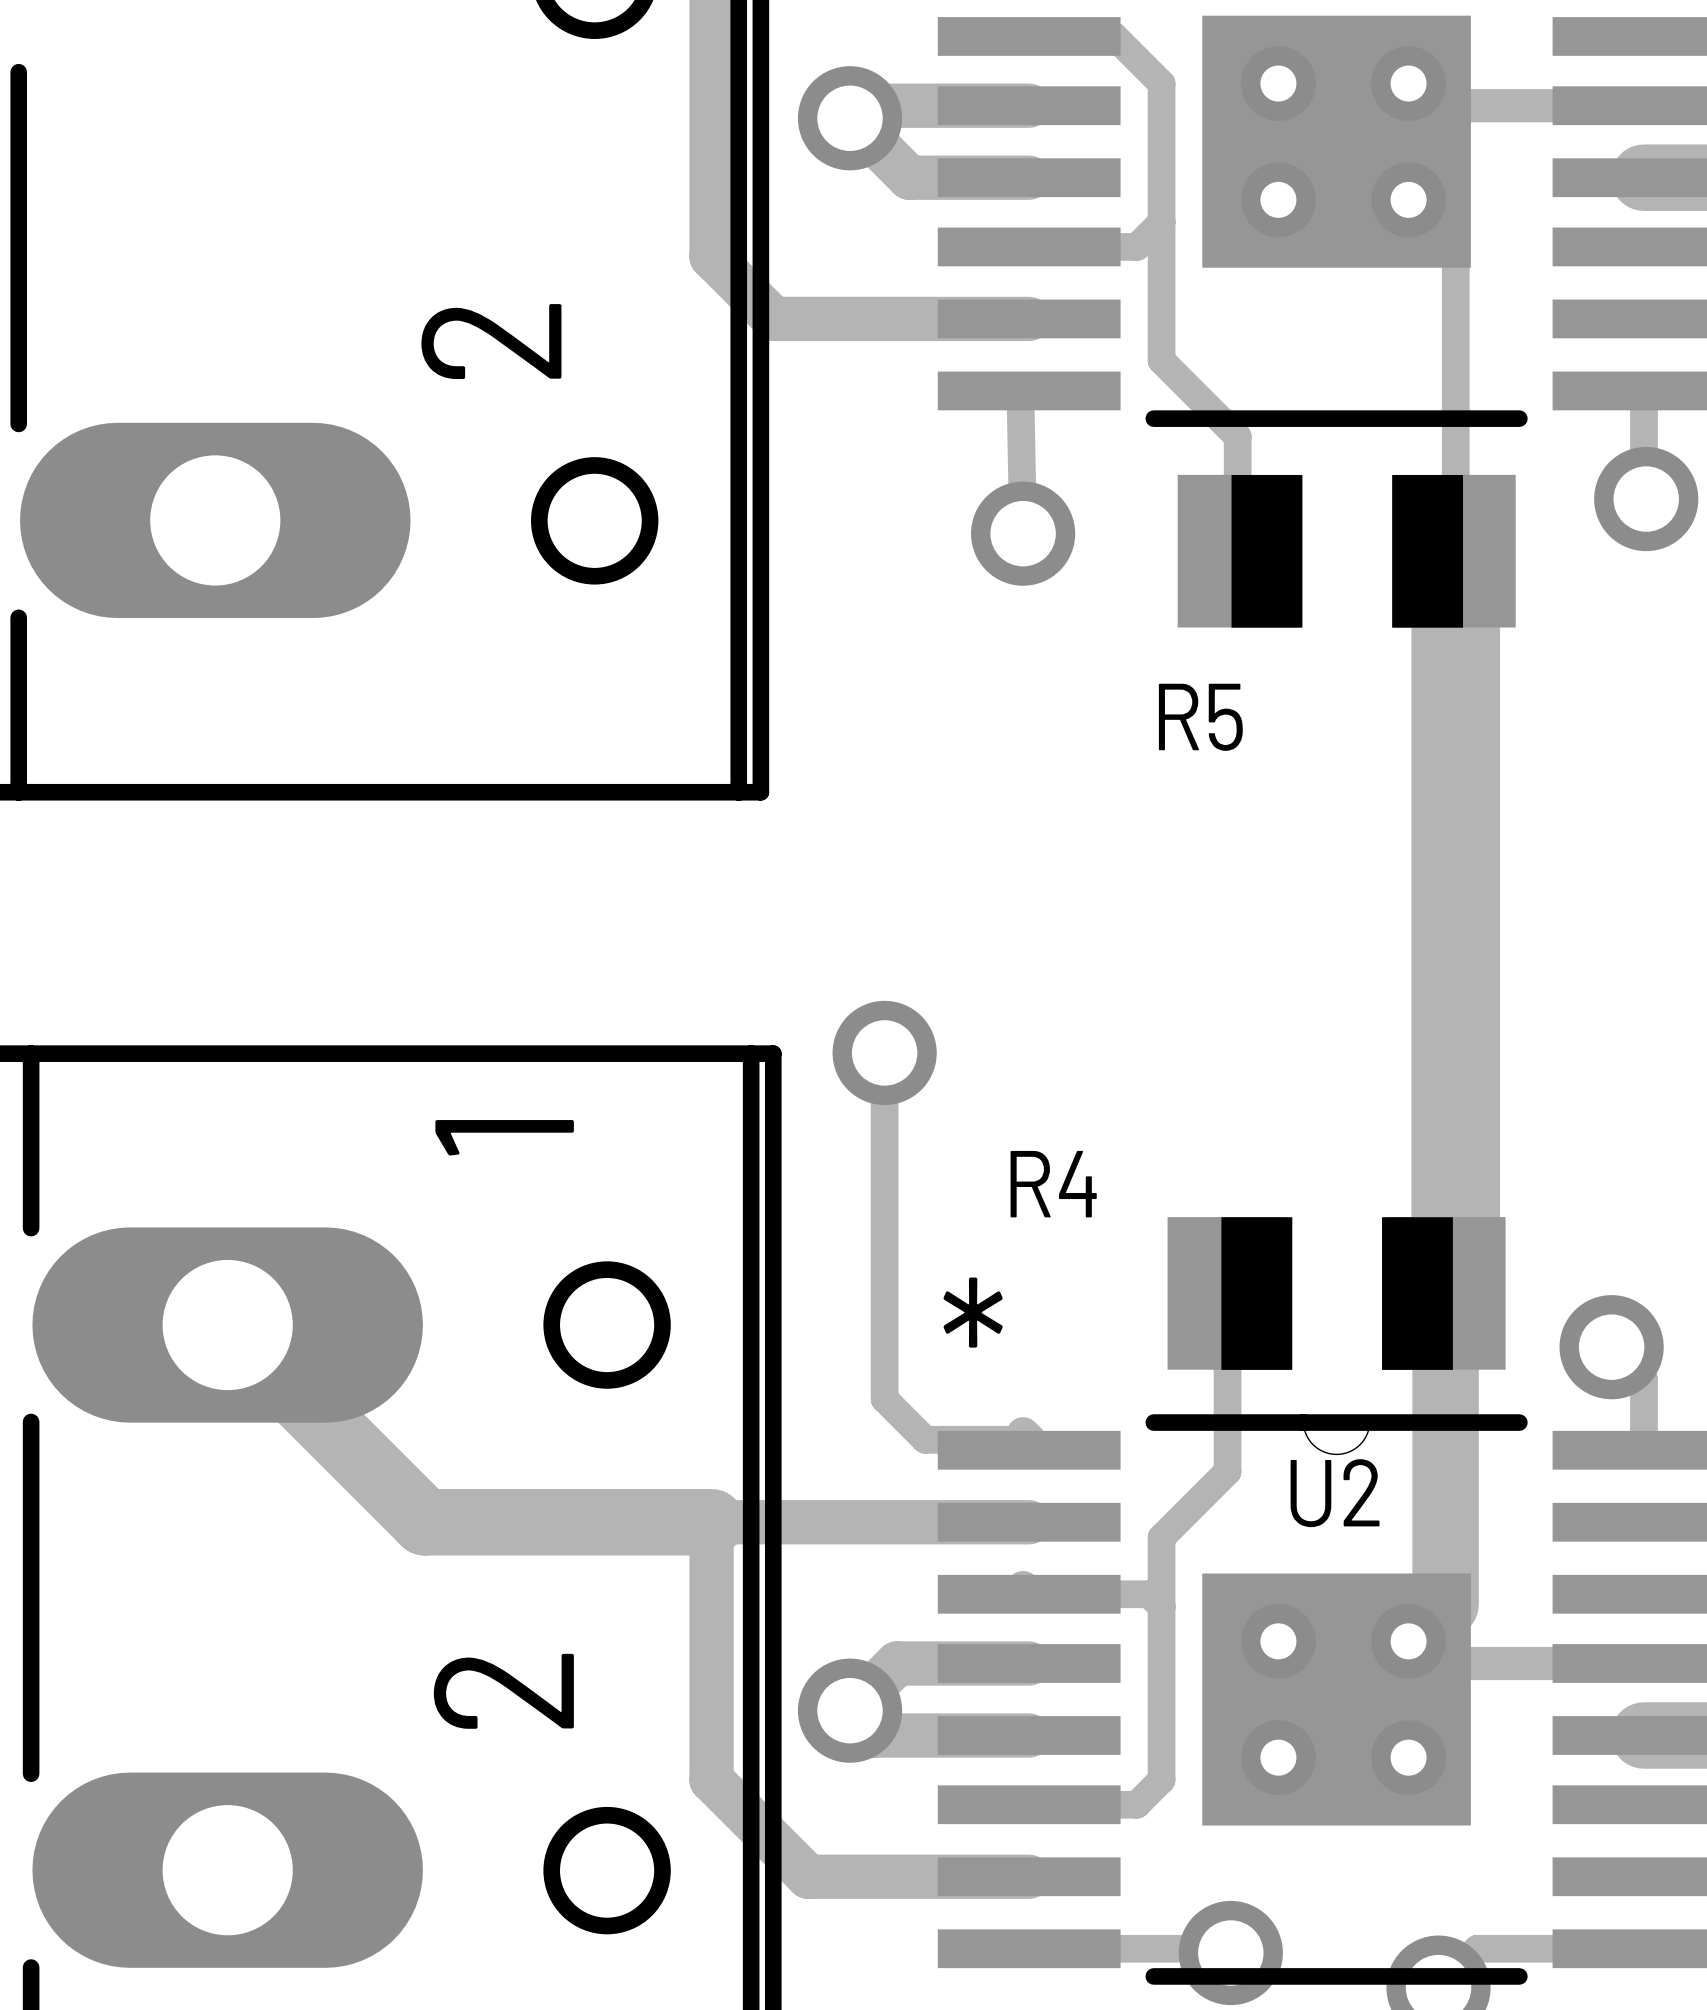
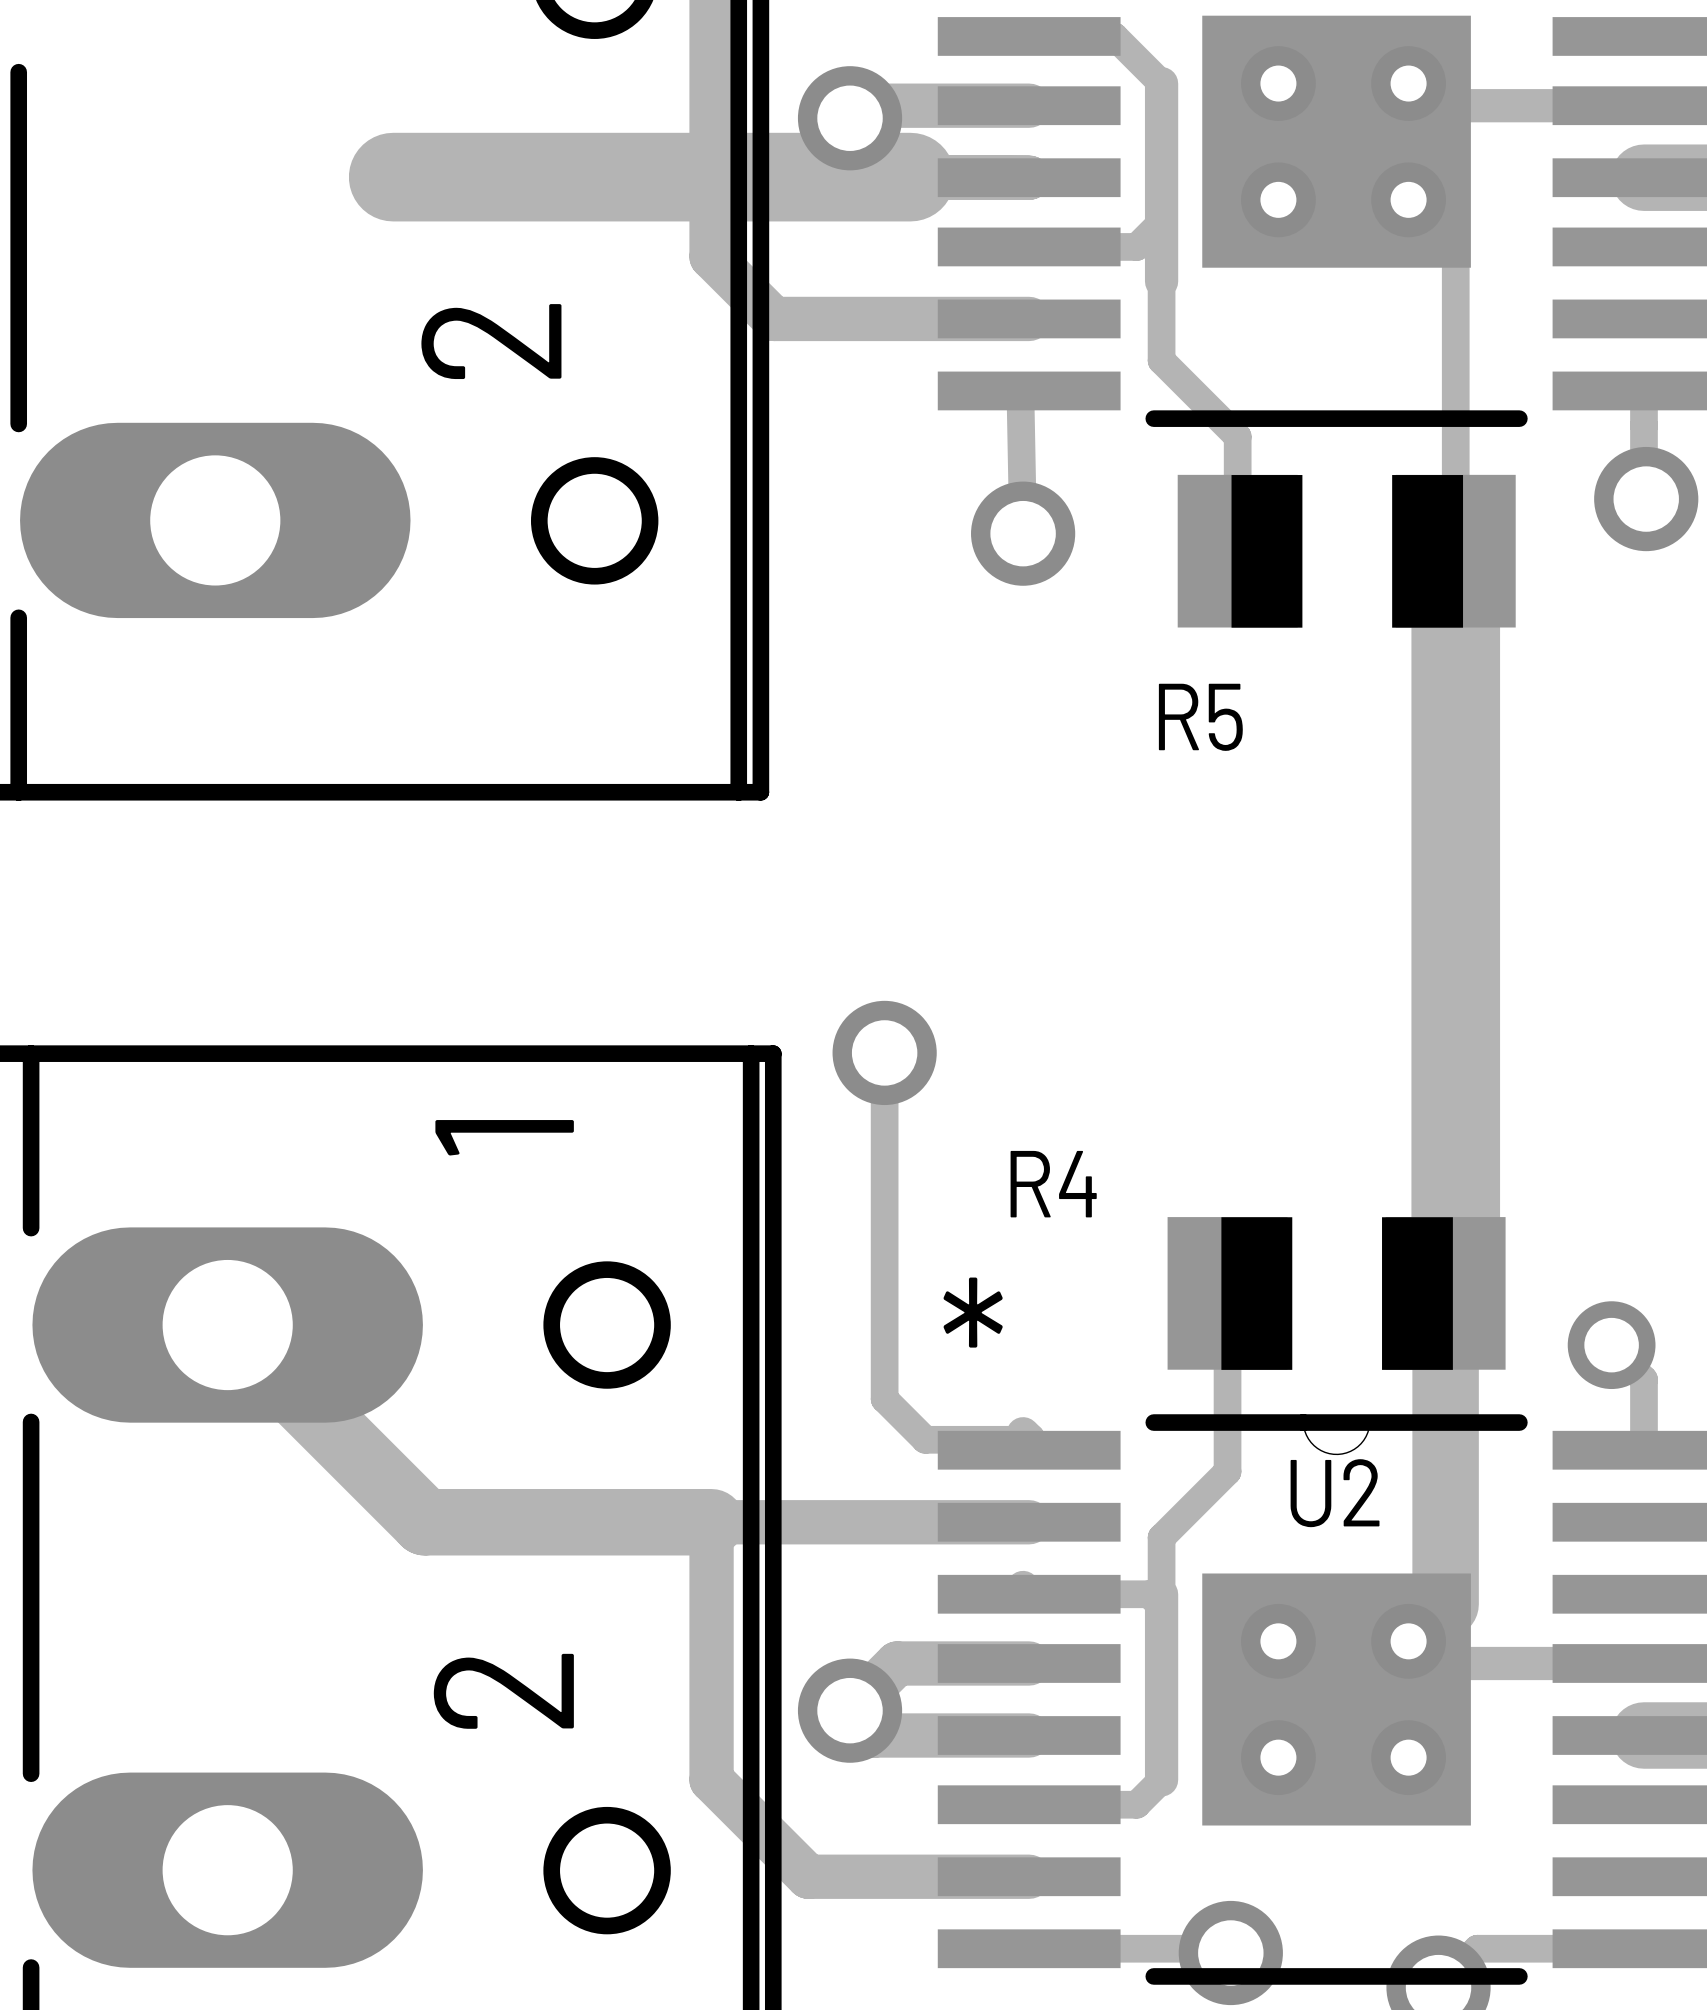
track width: thin (1161, 83) (1161, 281) -> thick (1161, 83) (1161, 281)
track: none -> (393, 177) (1029, 177)
via size: [1559, 1295, 1664, 1400] -> [1567, 1301, 1656, 1390]
track width: thin (1161, 1594) (1161, 1779) -> thick (1161, 1594) (1161, 1779)

